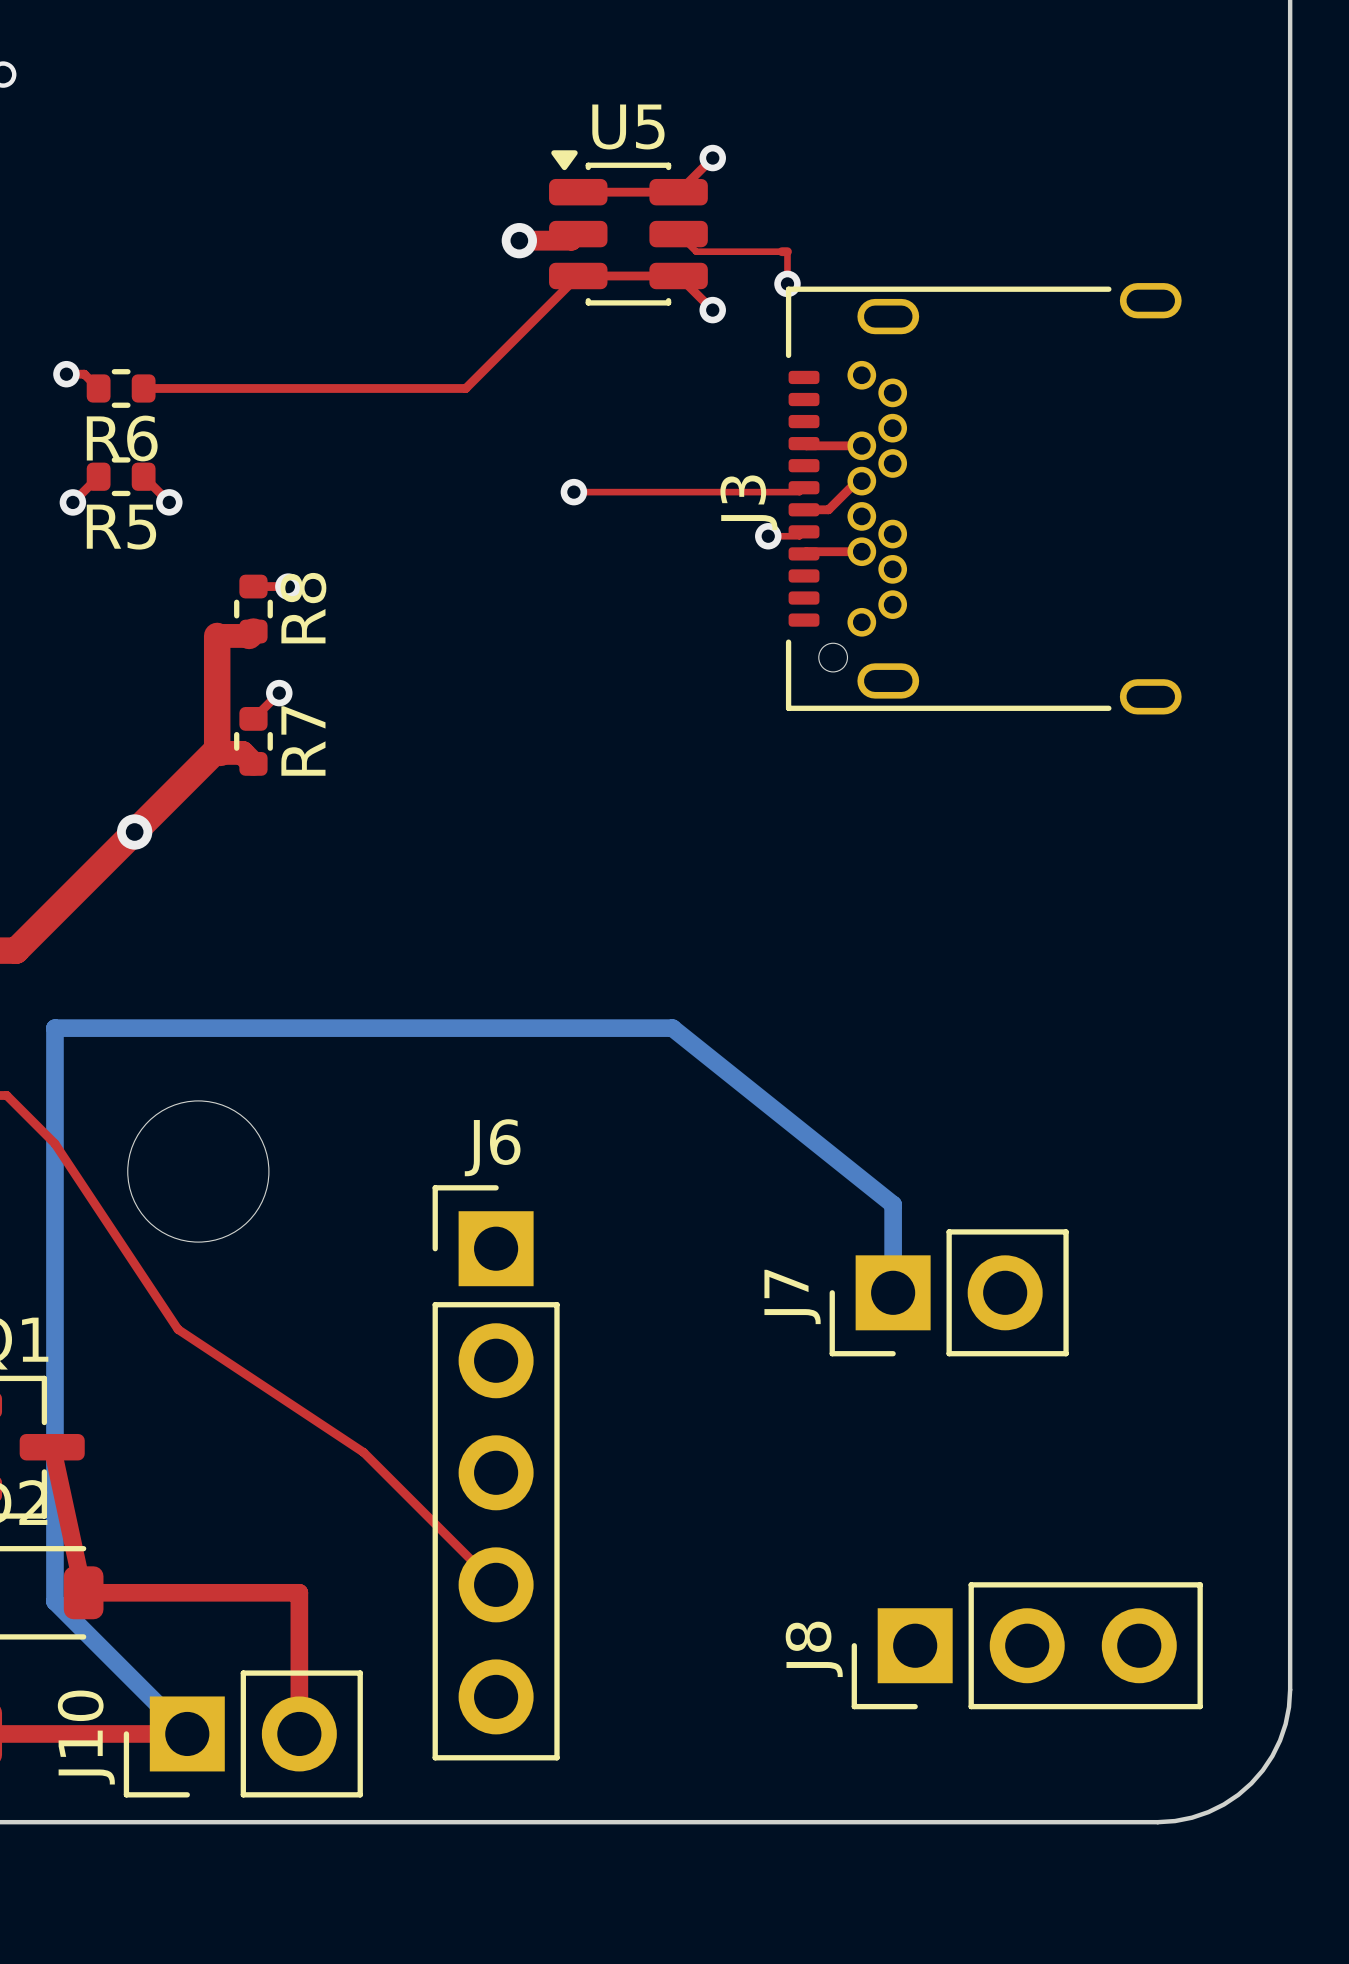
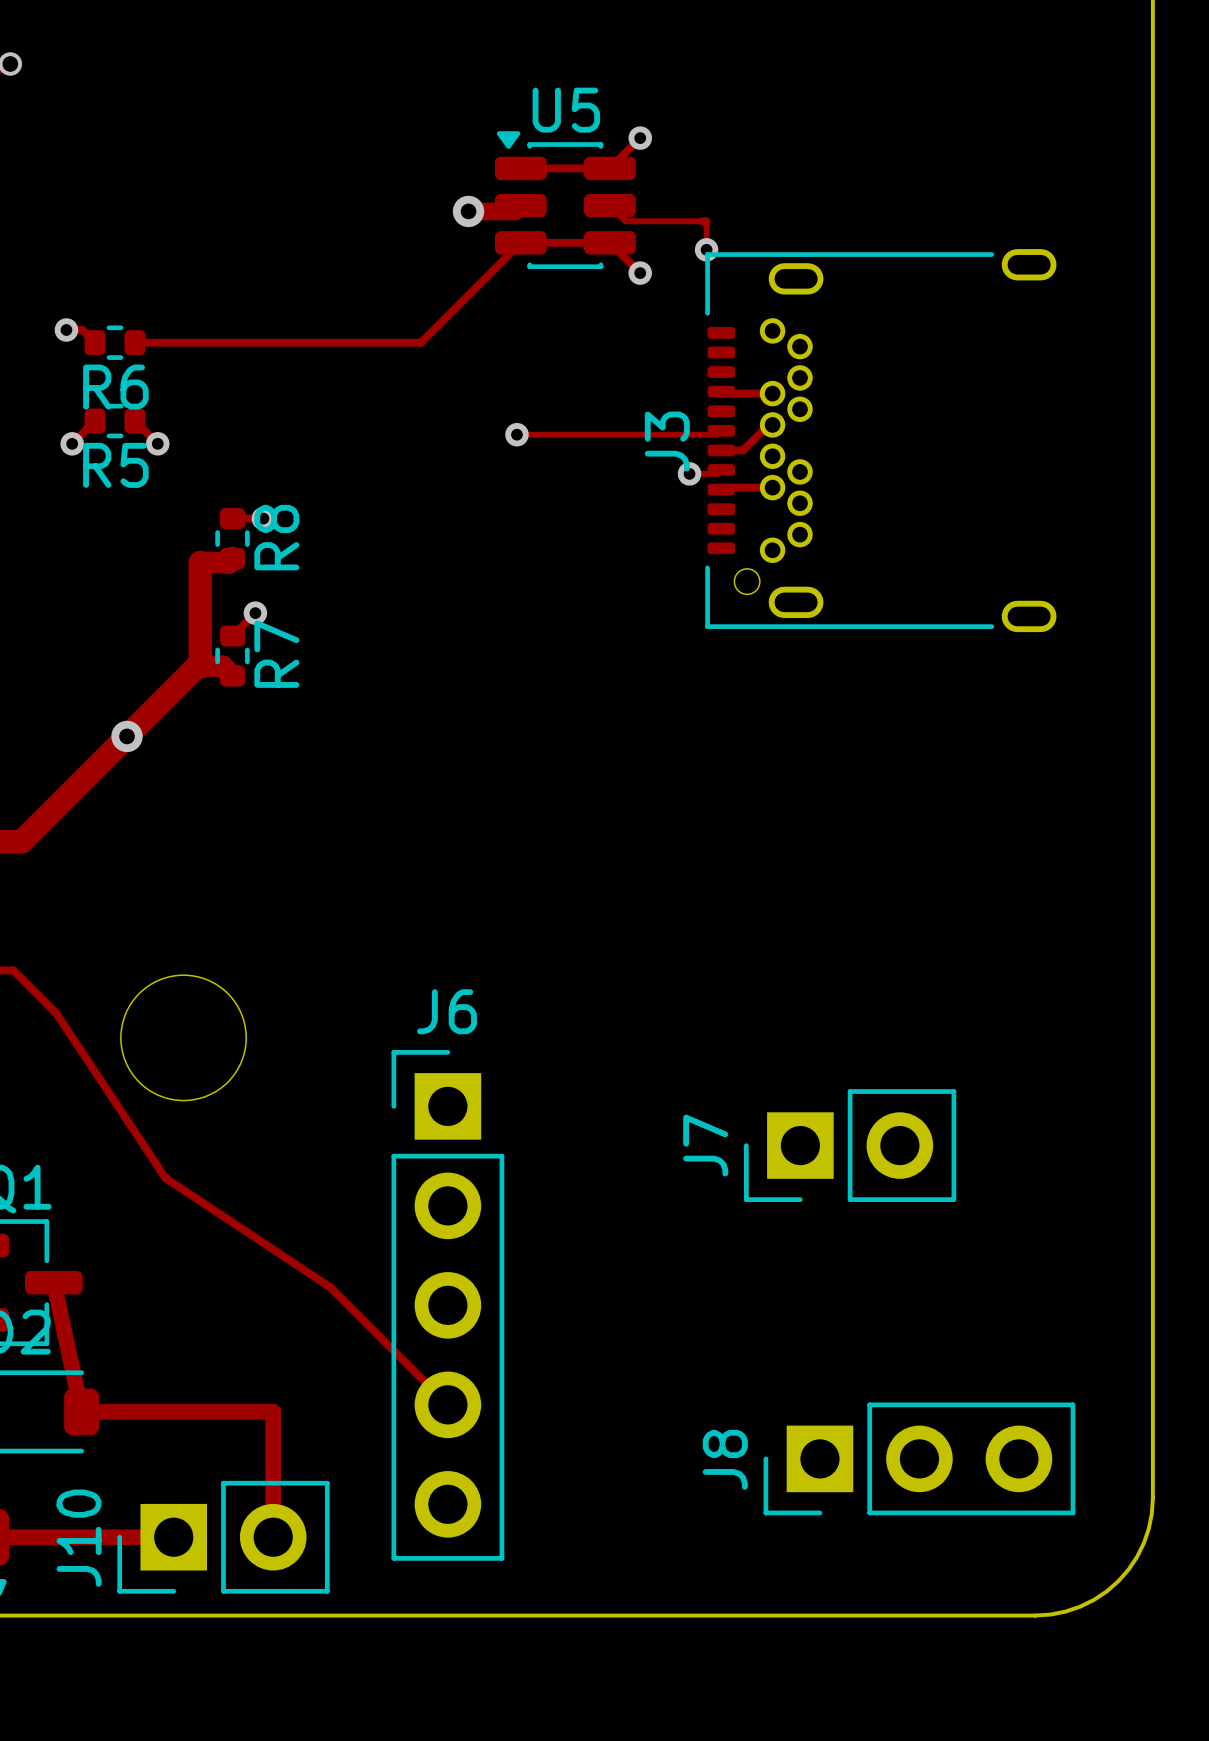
bottom track: (893, 1292) (893, 1204) (672, 1028) (54, 1028) (54, 1601) (187, 1733) -> none

